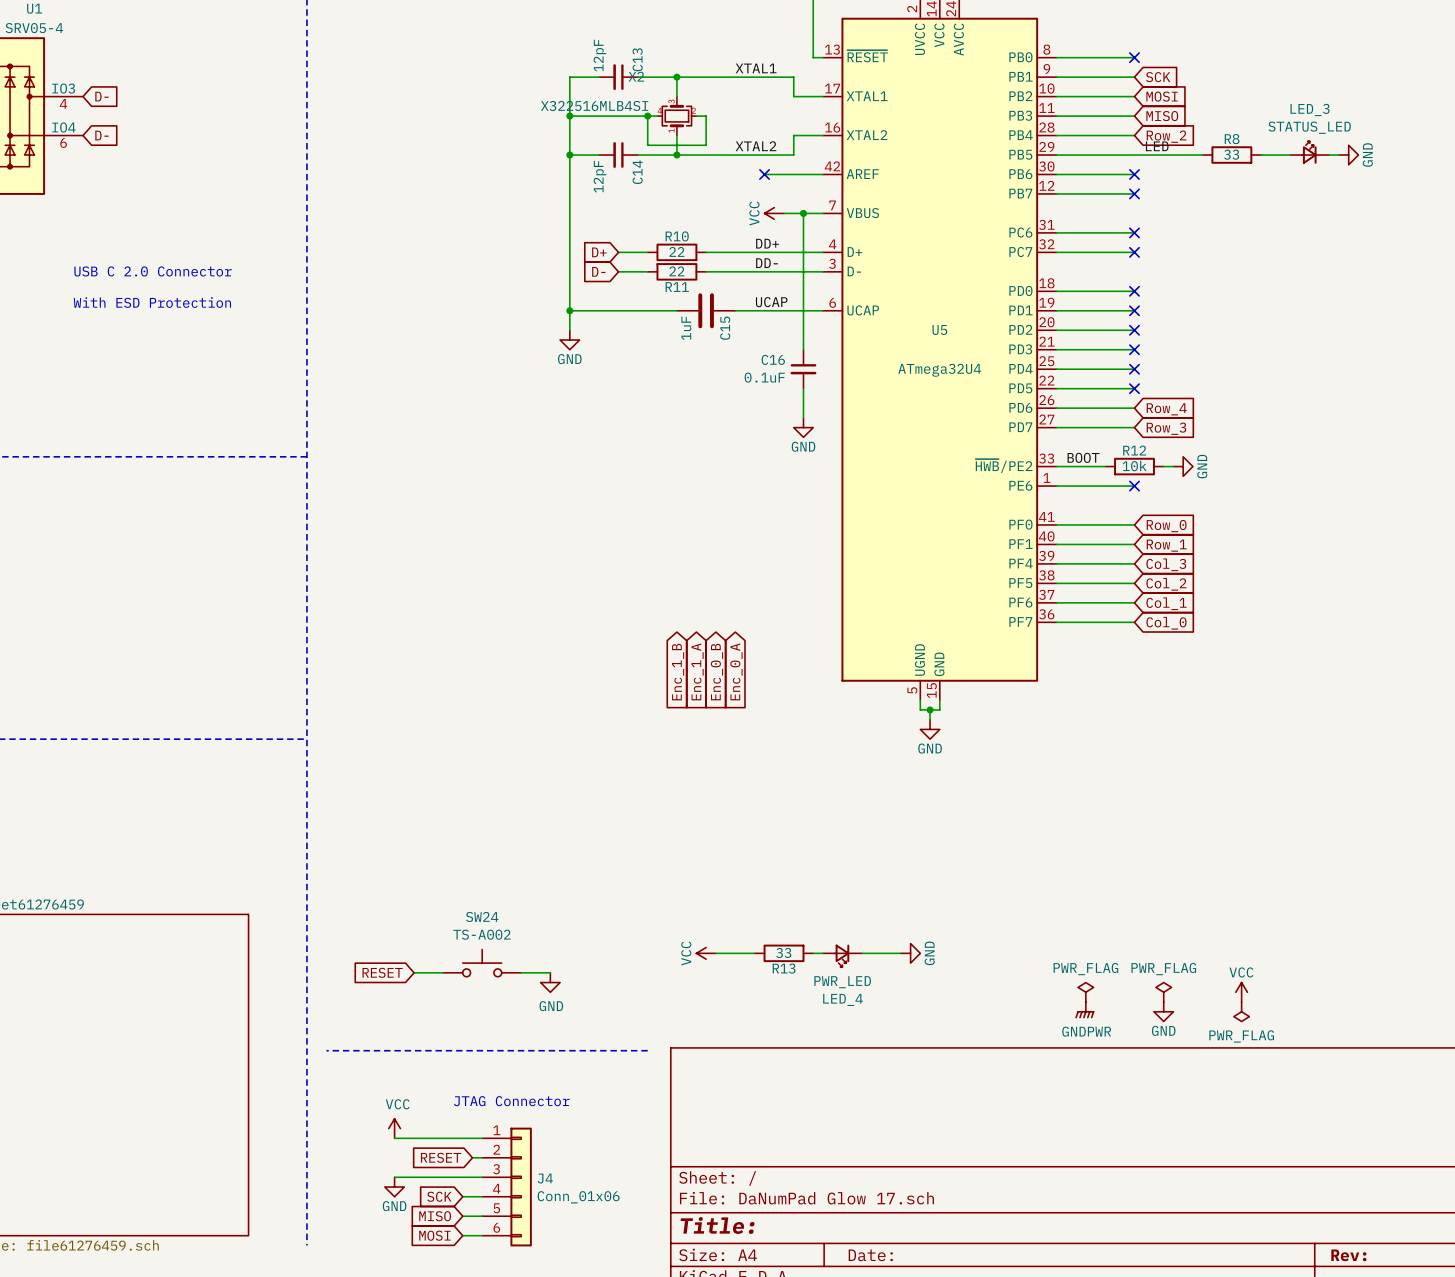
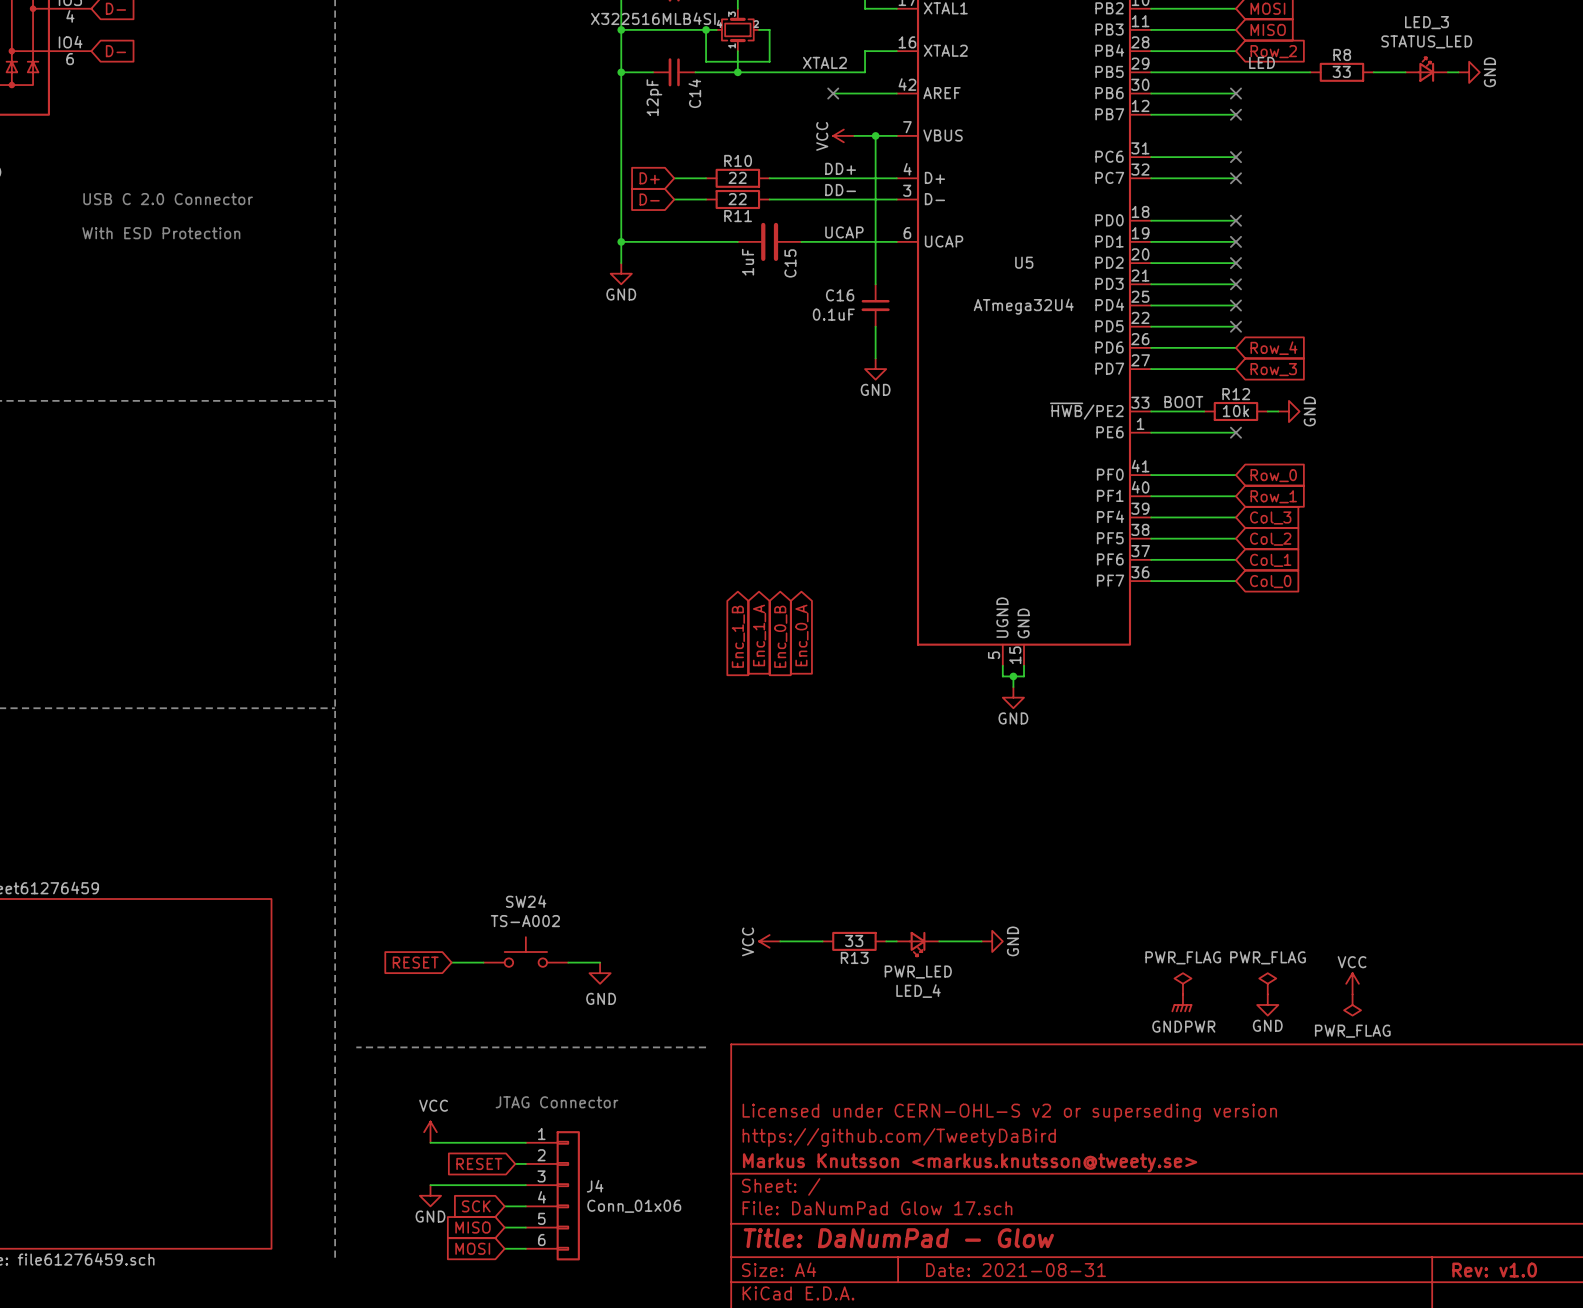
title block: none -> Licensed under CERN-OHL-S v2 or superseding version (1009, 1112)
title block: none -> https://github.com/TweetyDaBird (899, 1137)
title block: none -> Markus Knutsson <markus.knutsson@tweety.se> (970, 1162)
title block: Title: (717, 1225) -> Title: DaNumPad - Glow (898, 1238)
title block: Date: (870, 1255) -> Date: 2021-08-31 (1016, 1270)
title block: Rev: (1348, 1255) -> Rev: v1.0 (1494, 1270)

